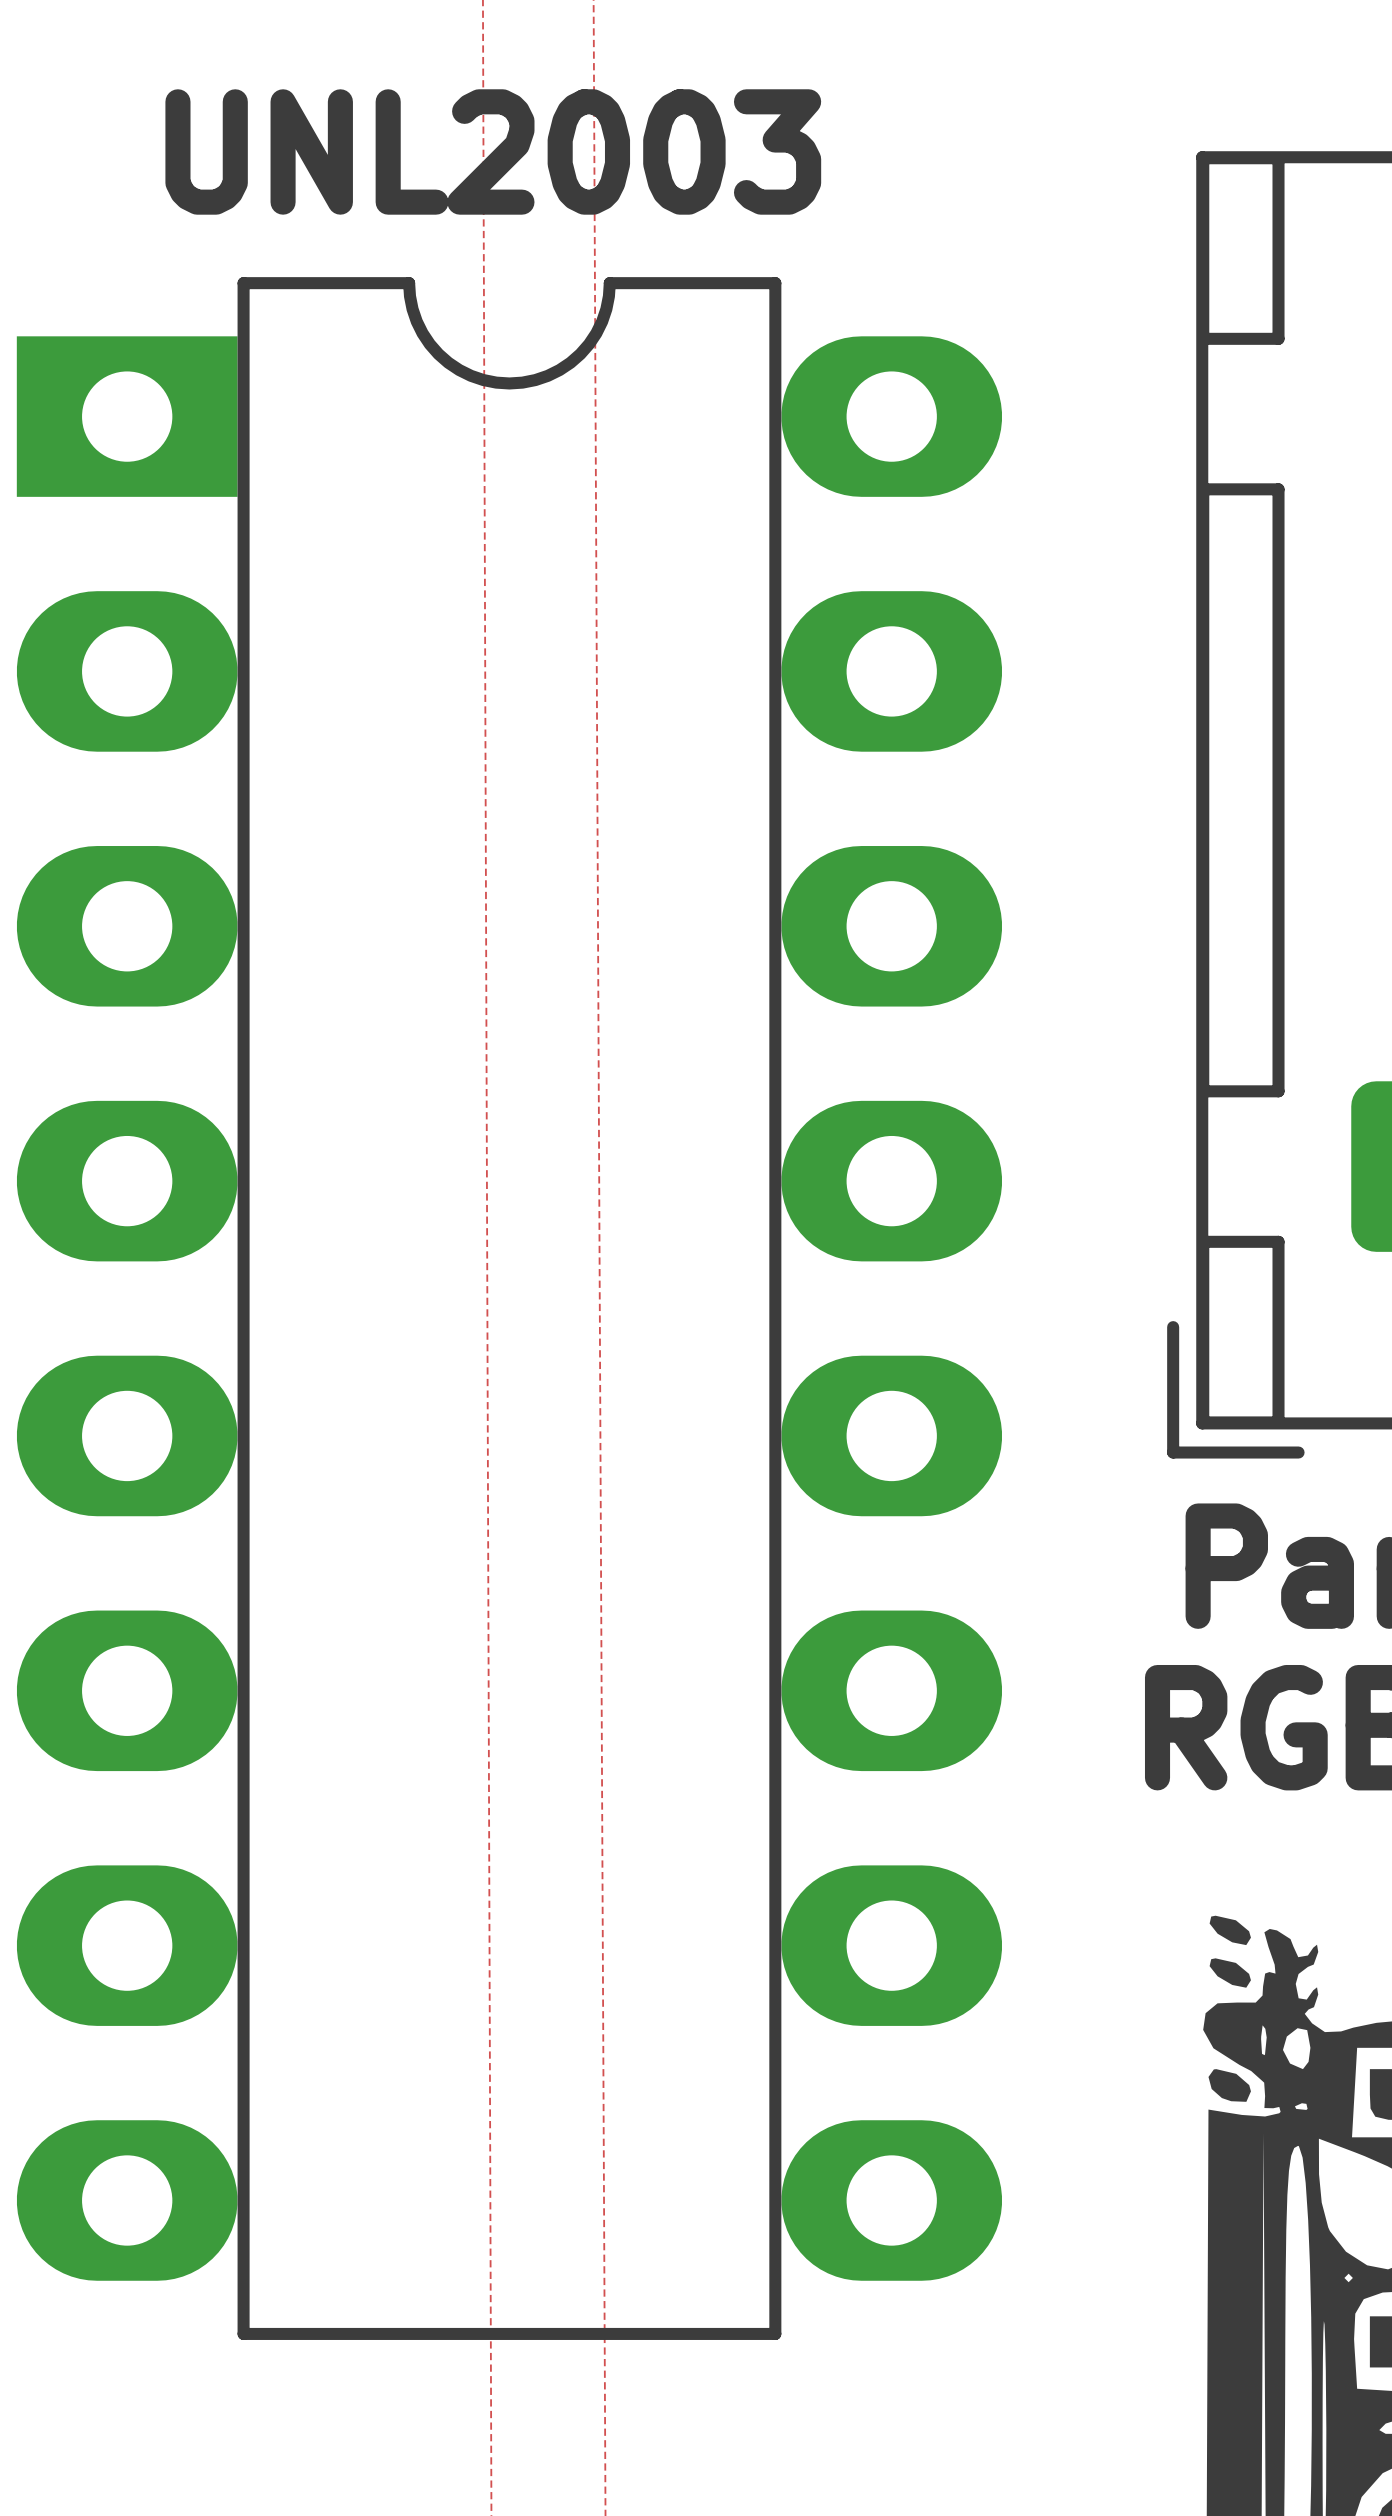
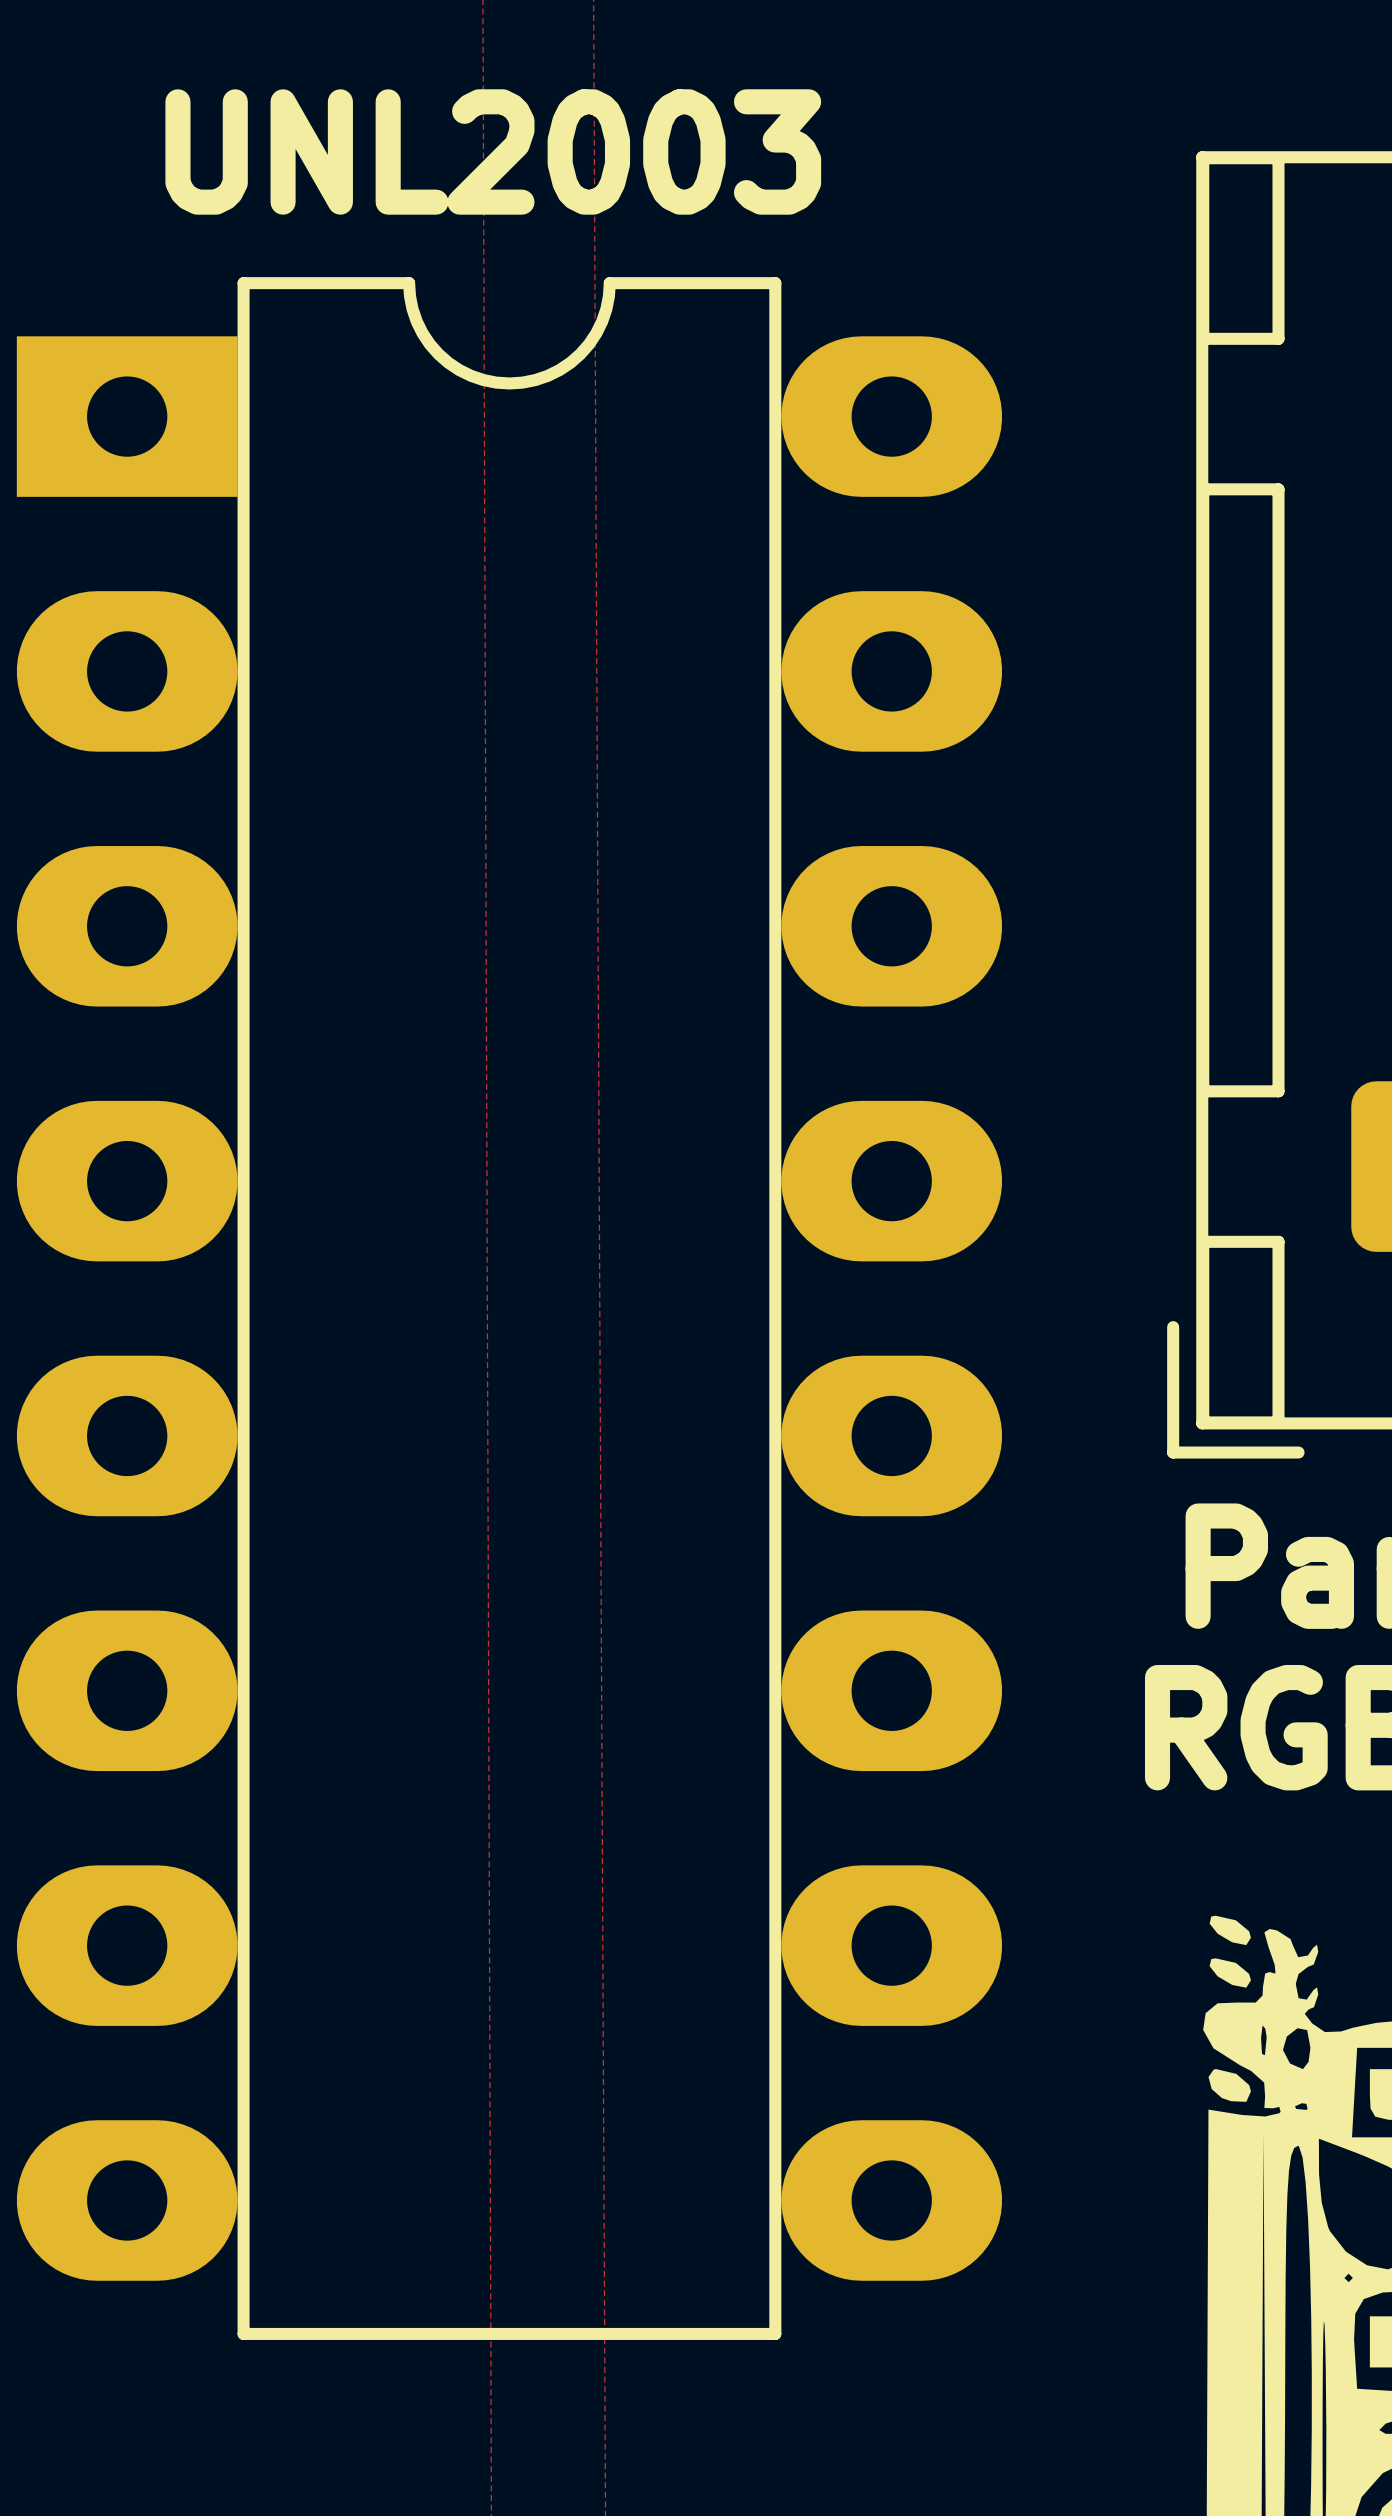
part footprint: [16, 277, 1003, 2340] -> [16, 277, 1003, 2340]

